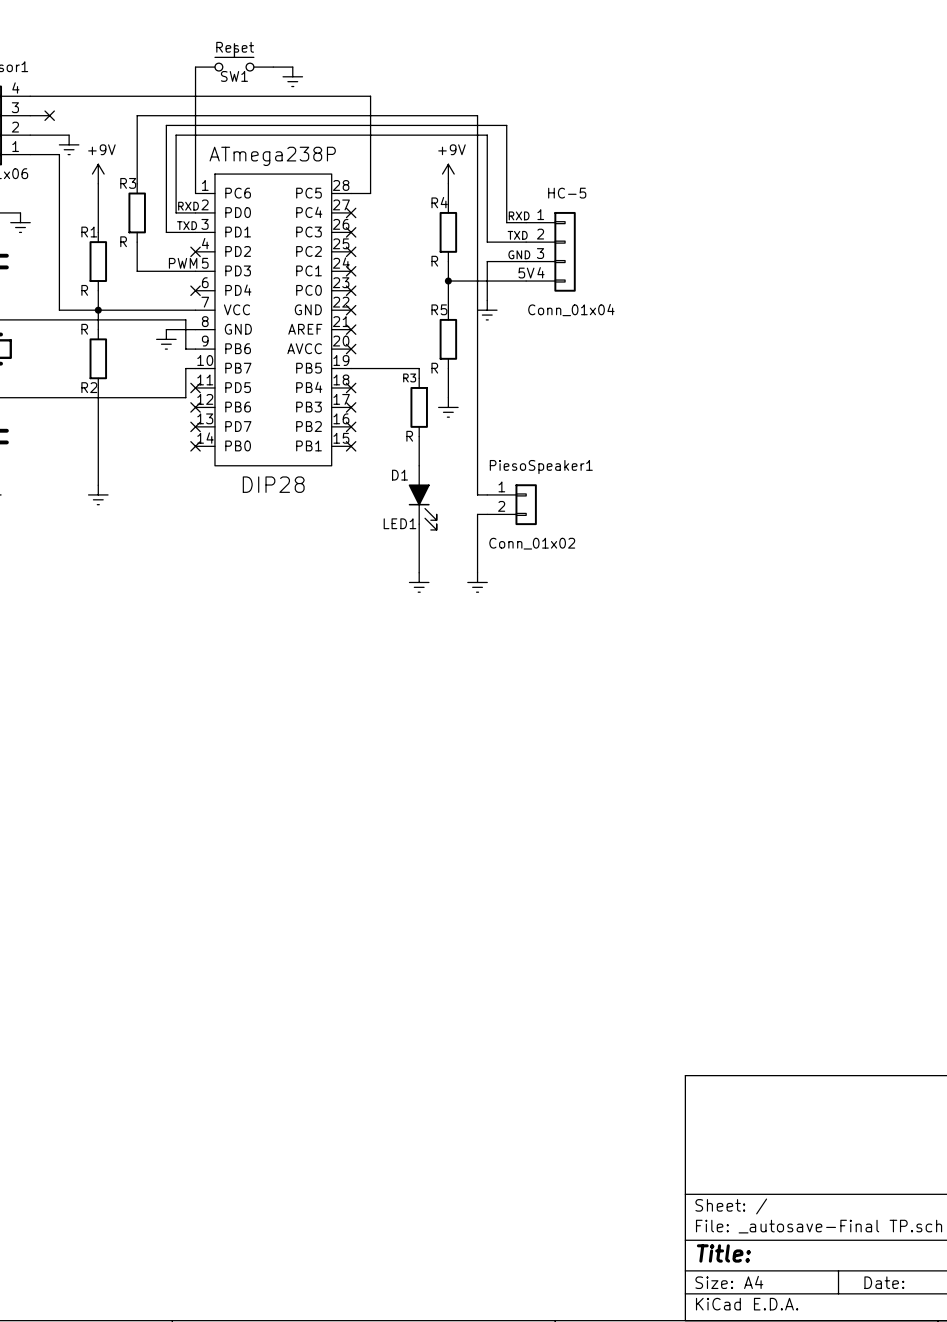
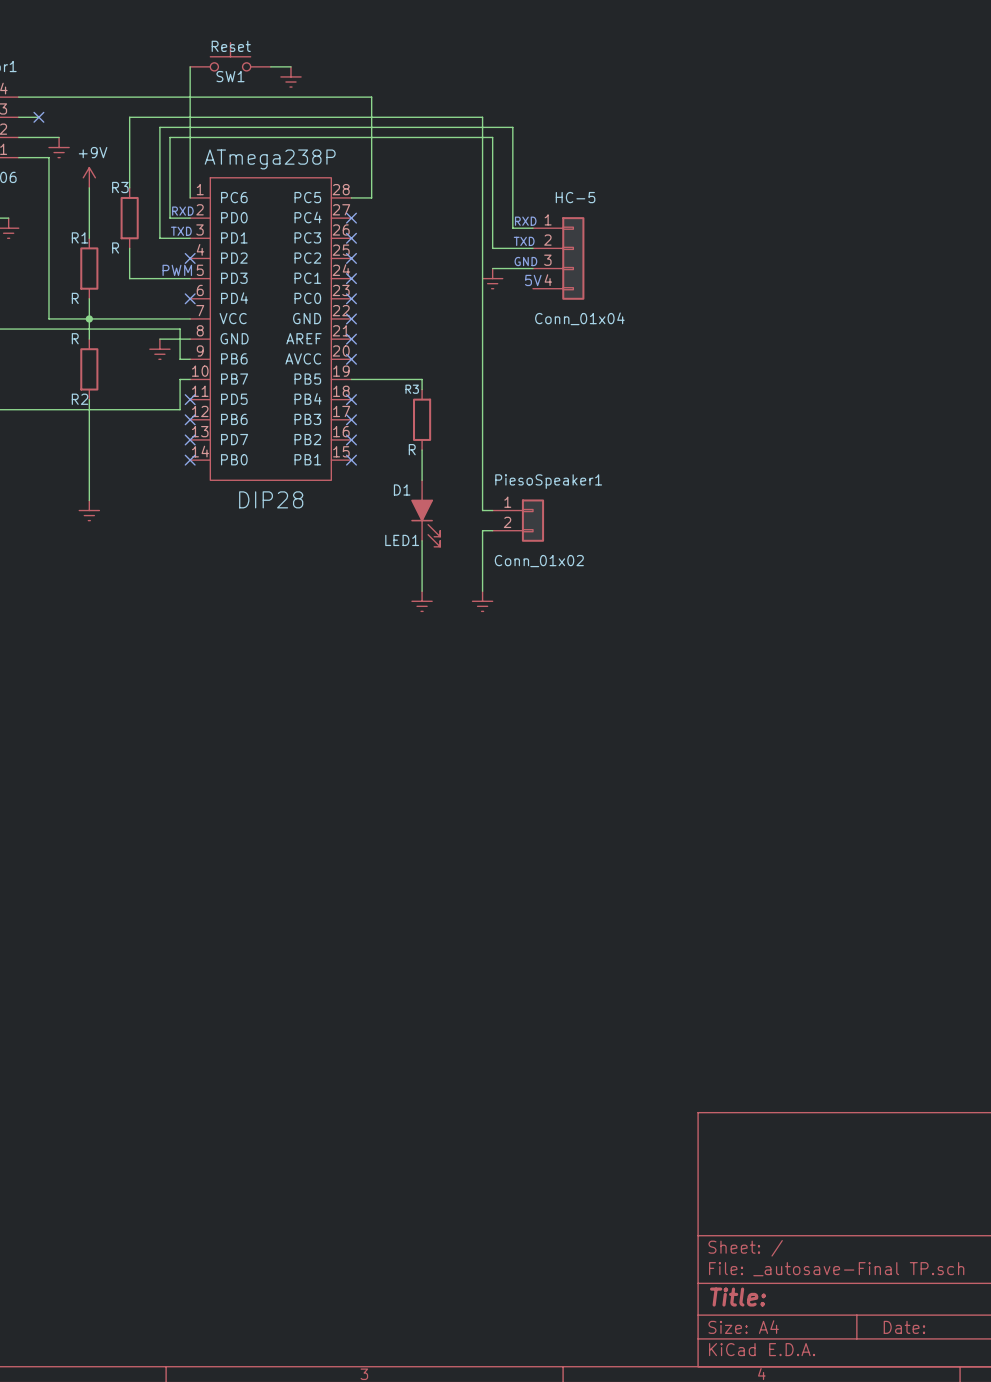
power symbol: +9V (448, 174) -> none
wire: (448, 183) (448, 203) -> none
R4: R (448, 232) -> none
wire: (448, 261) (448, 310) -> none
wire: (487, 261) (487, 300) -> none
wire: (448, 281) (526, 281) -> none
junction: (448, 281) -> none
power symbol position: (487, 310) -> (492, 278)
R5: R (448, 339) -> none
wire: (448, 368) (448, 397) -> none
power symbol: (448, 407) -> none

